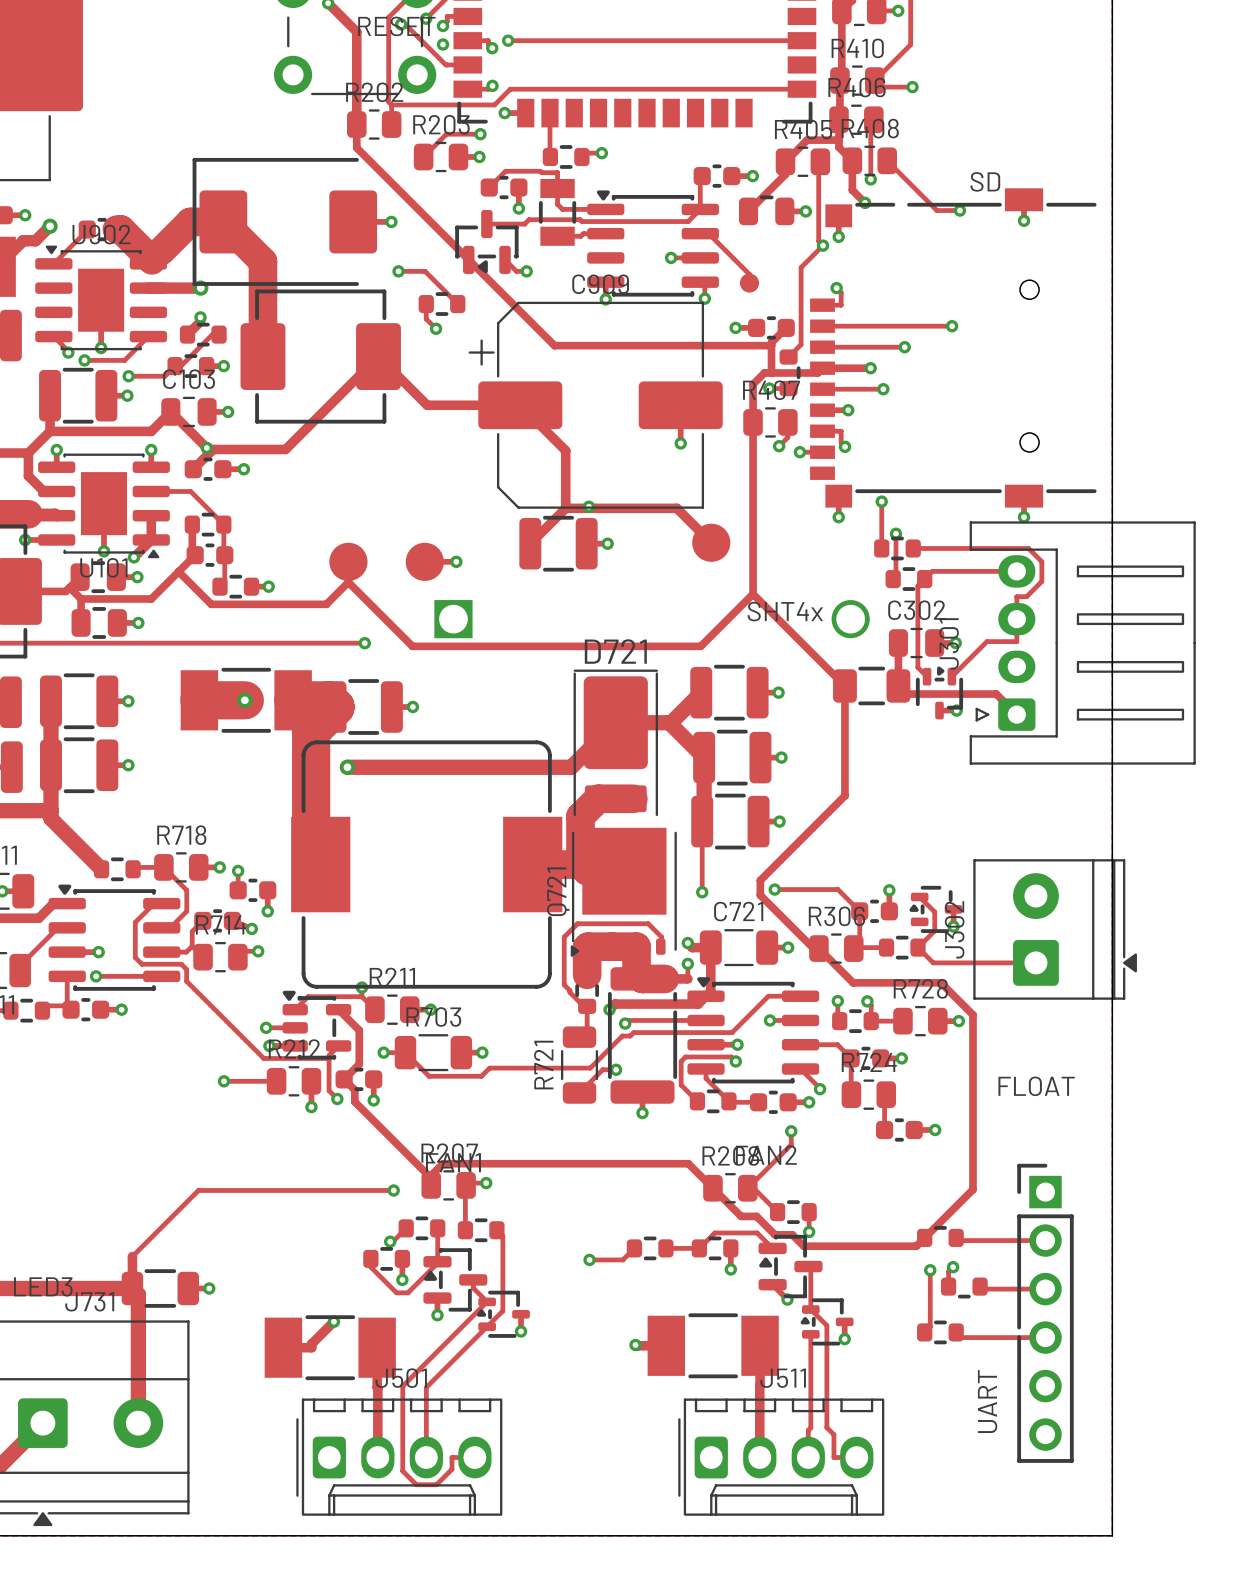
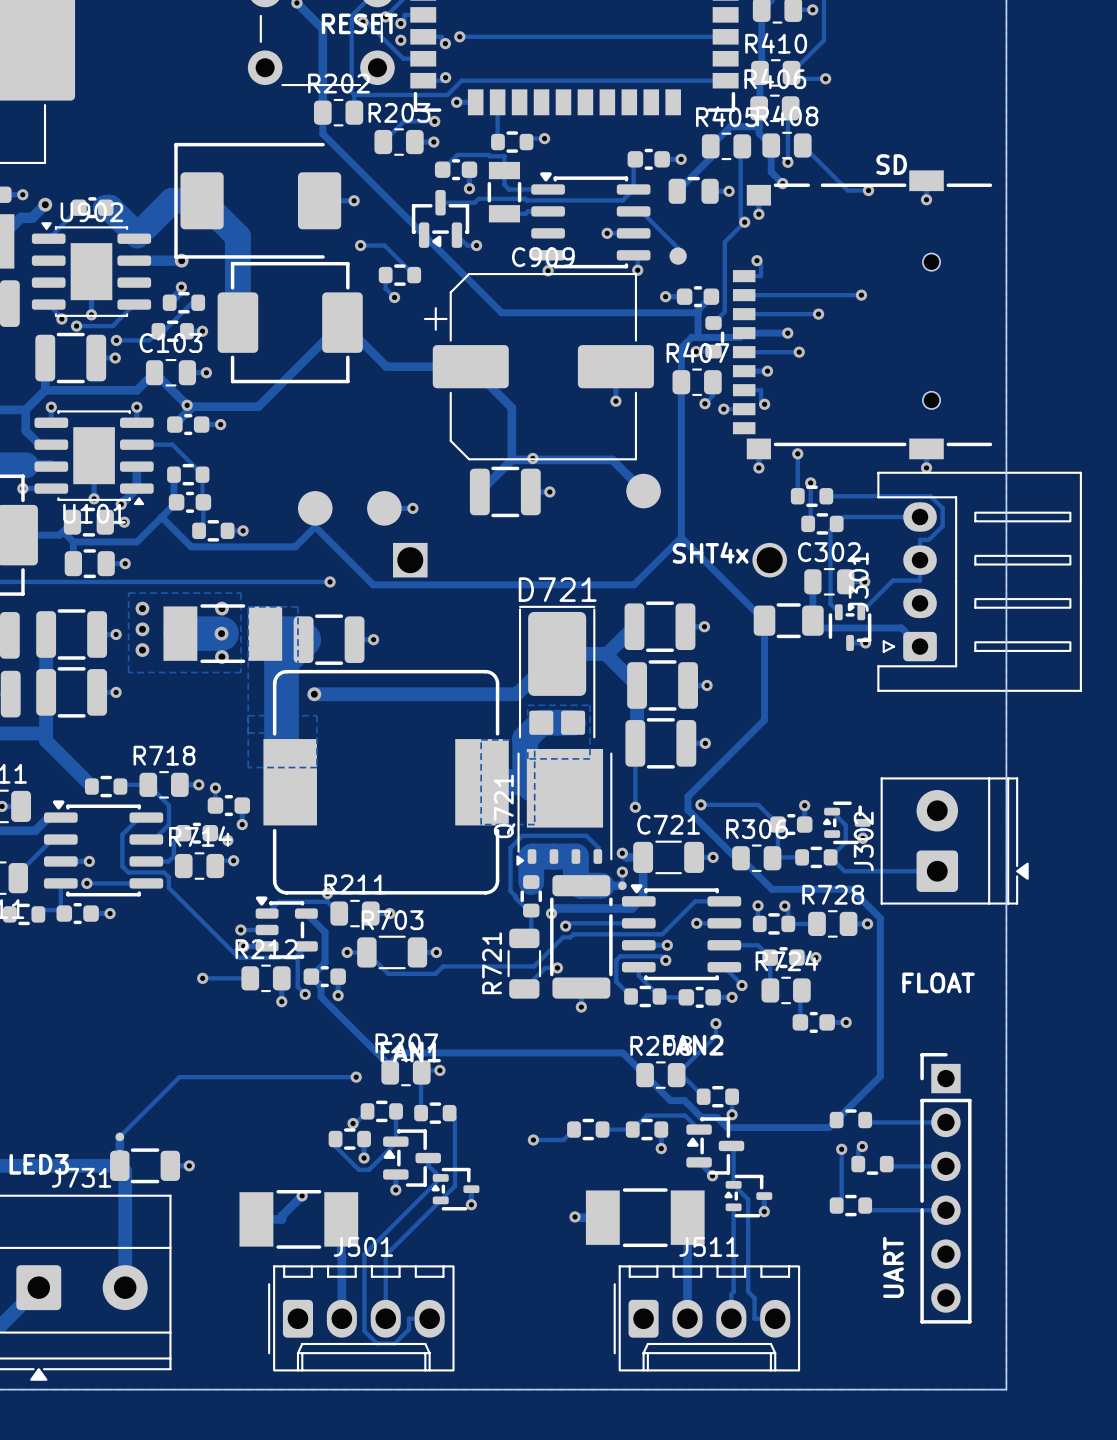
zone outline: none -> (128, 593) (240, 593) (240, 672) (128, 672) (128, 593)
via: none -> (142, 608)
via: none -> (221, 608)
via: none -> (142, 629)
via: none -> (142, 650)
via: none -> (221, 656)
zone outline: none -> (527, 705) (589, 705) (589, 758) (527, 758) (527, 705)
zone outline: none -> (248, 715) (316, 715) (316, 767) (248, 767) (248, 606) (297, 606) (297, 732) (248, 732)
zone outline: none -> (481, 739) (534, 739) (534, 824) (481, 824) (481, 739)

